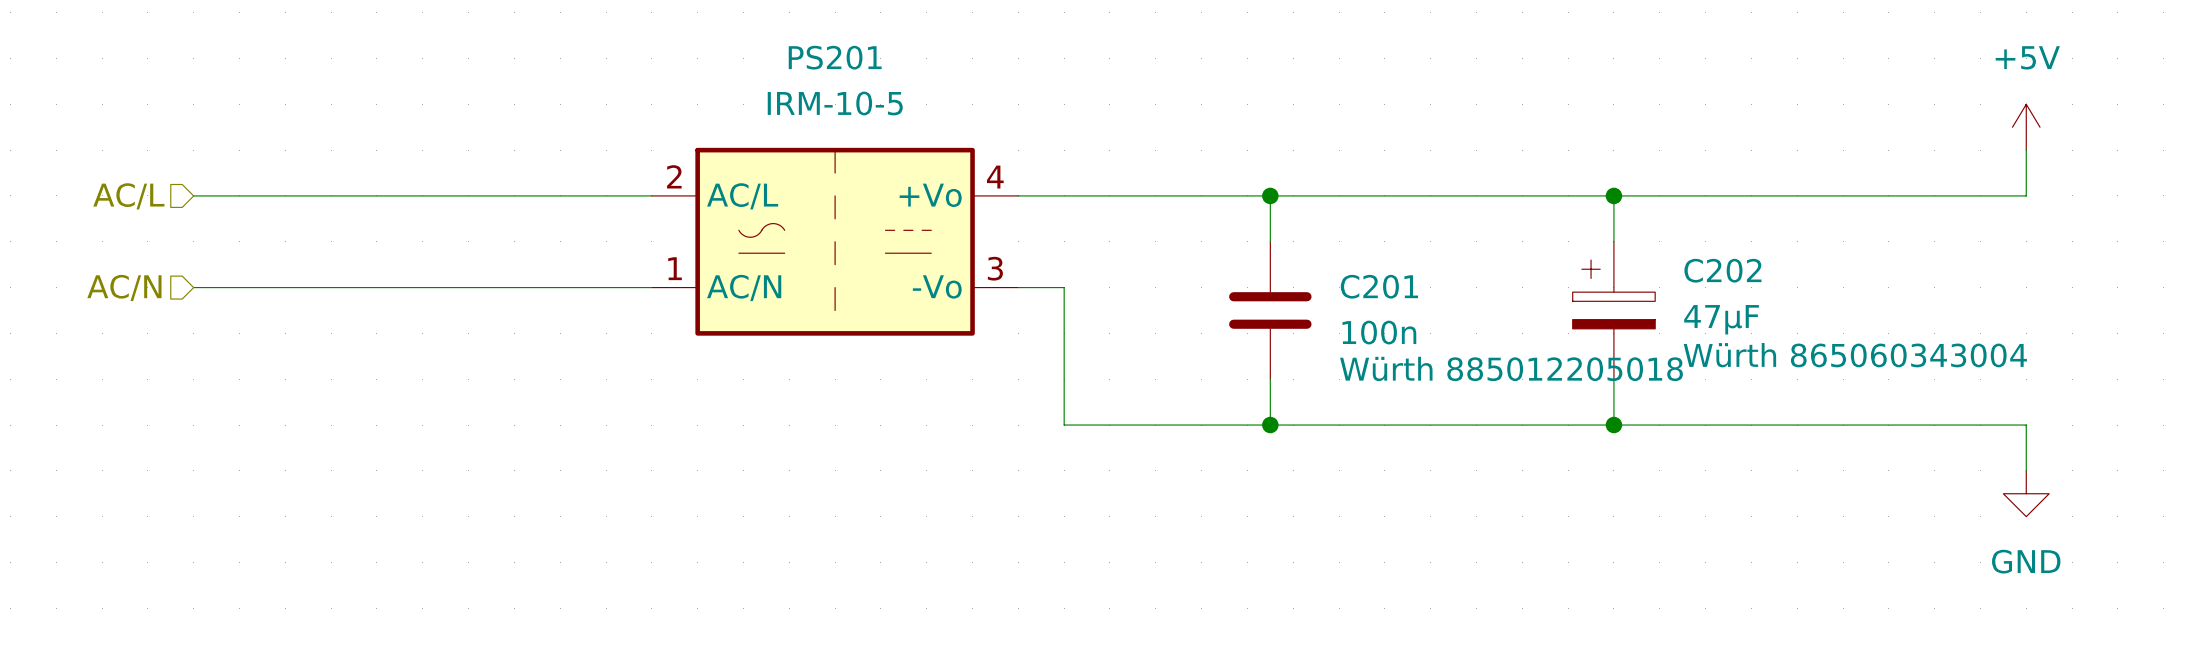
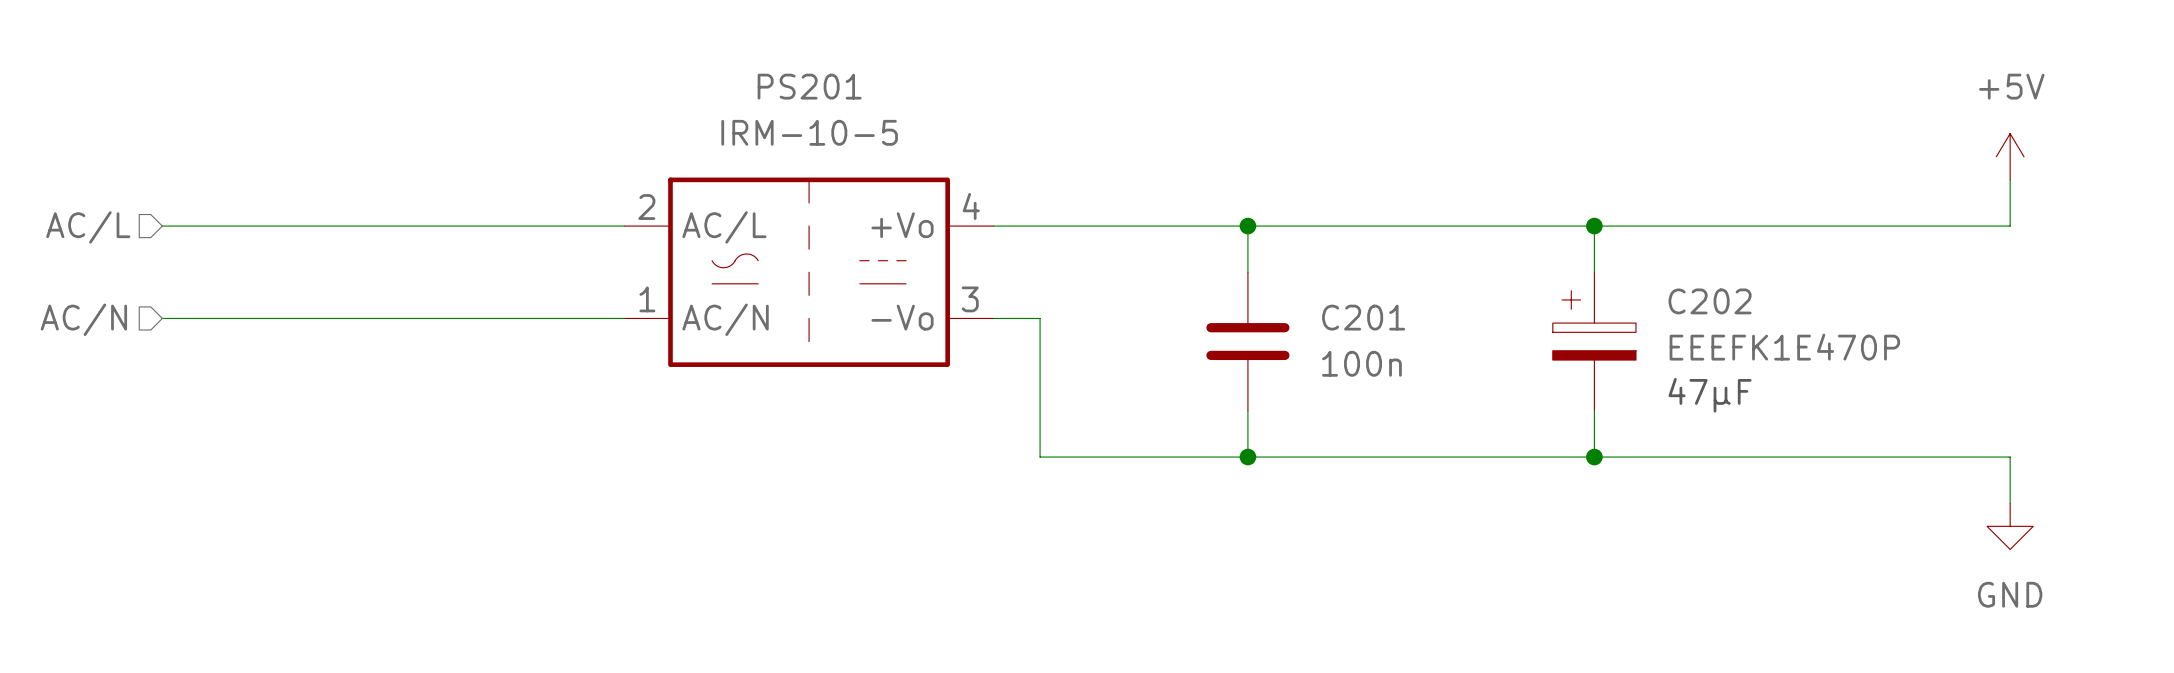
C202 value: 47μF (1721, 319) -> EEEFK1E470P (1784, 347)
C202 text: Würth 865060343004 (1855, 355) -> none
text: none -> 47µF (1710, 395)
C201 text: Würth 885012205018 (1511, 368) -> none

